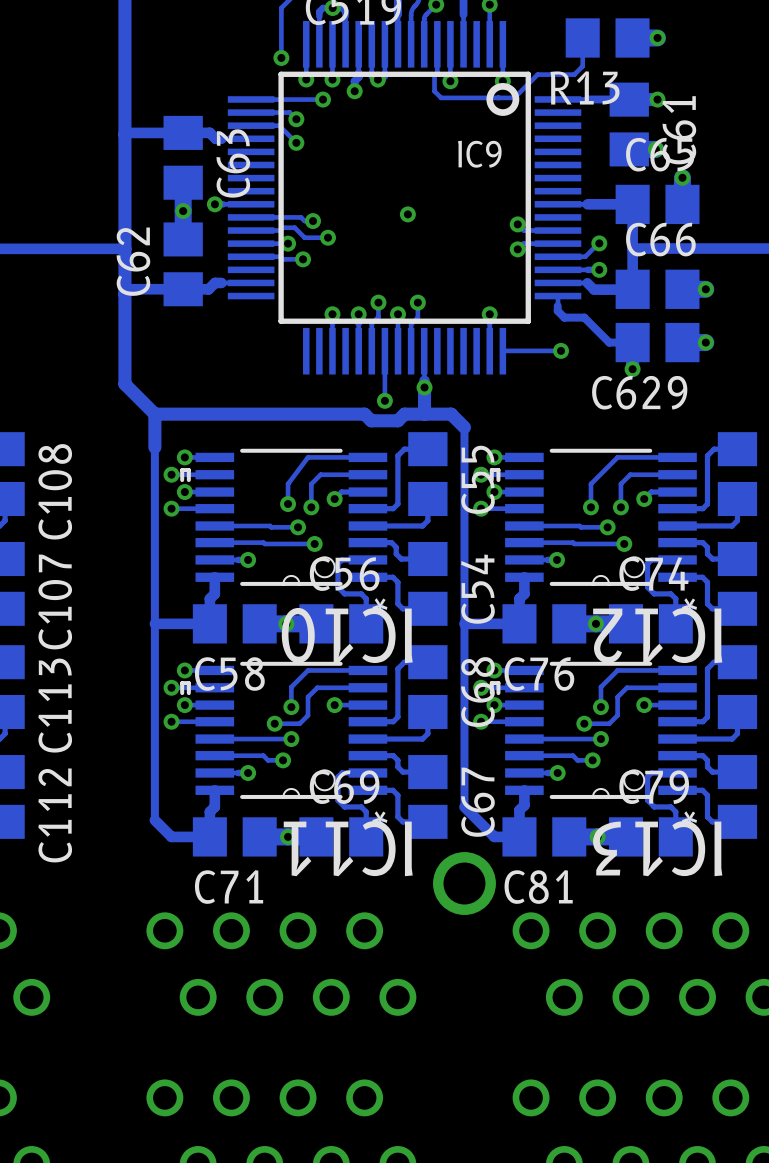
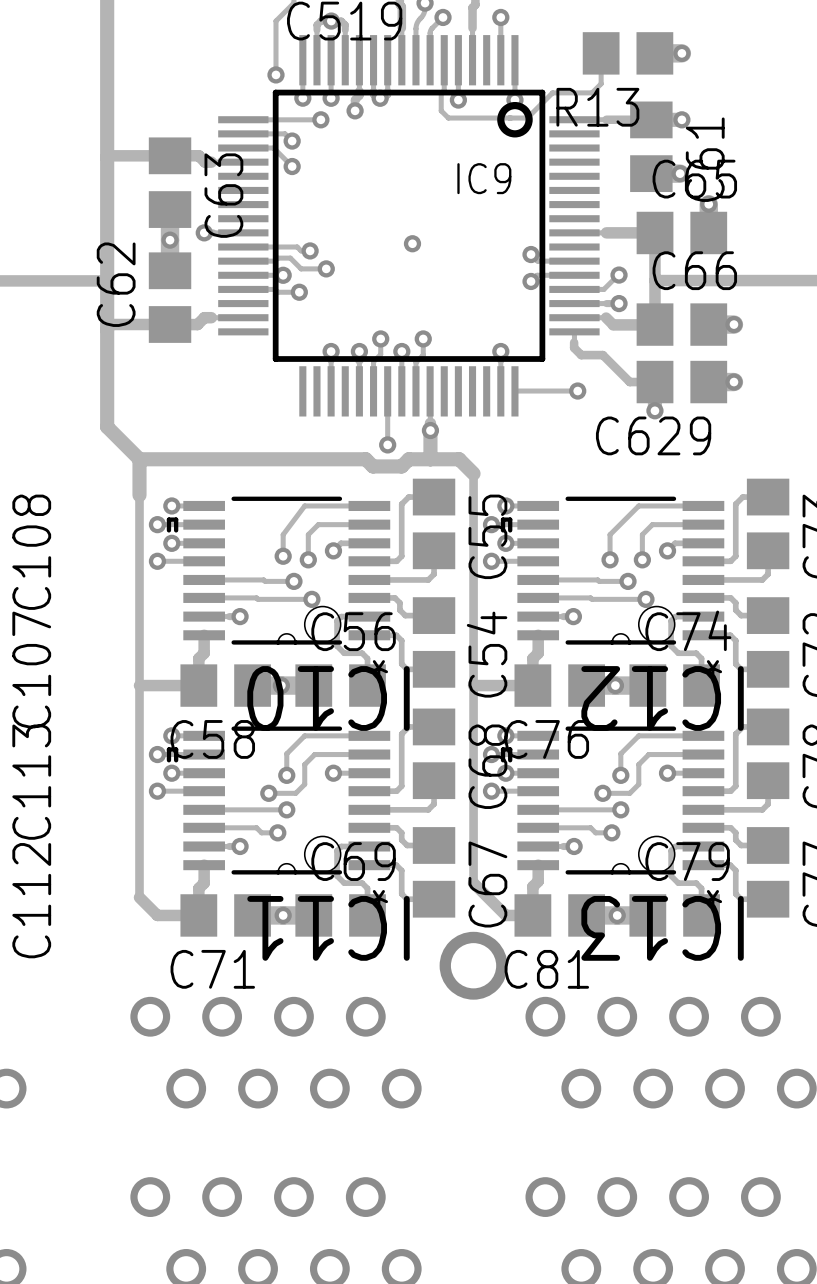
IC10 footprint: [180, 448, 388, 586] -> [166, 496, 391, 645]
IC12 footprint: [489, 448, 697, 586] -> [500, 496, 725, 645]
IC11 footprint: [180, 661, 388, 799] -> [166, 726, 391, 875]
IC13 footprint: [489, 661, 697, 799] -> [500, 726, 725, 875]

